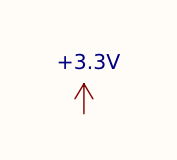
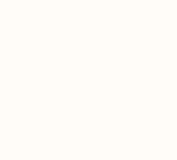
power symbol: +3.3V (83, 98) -> none

